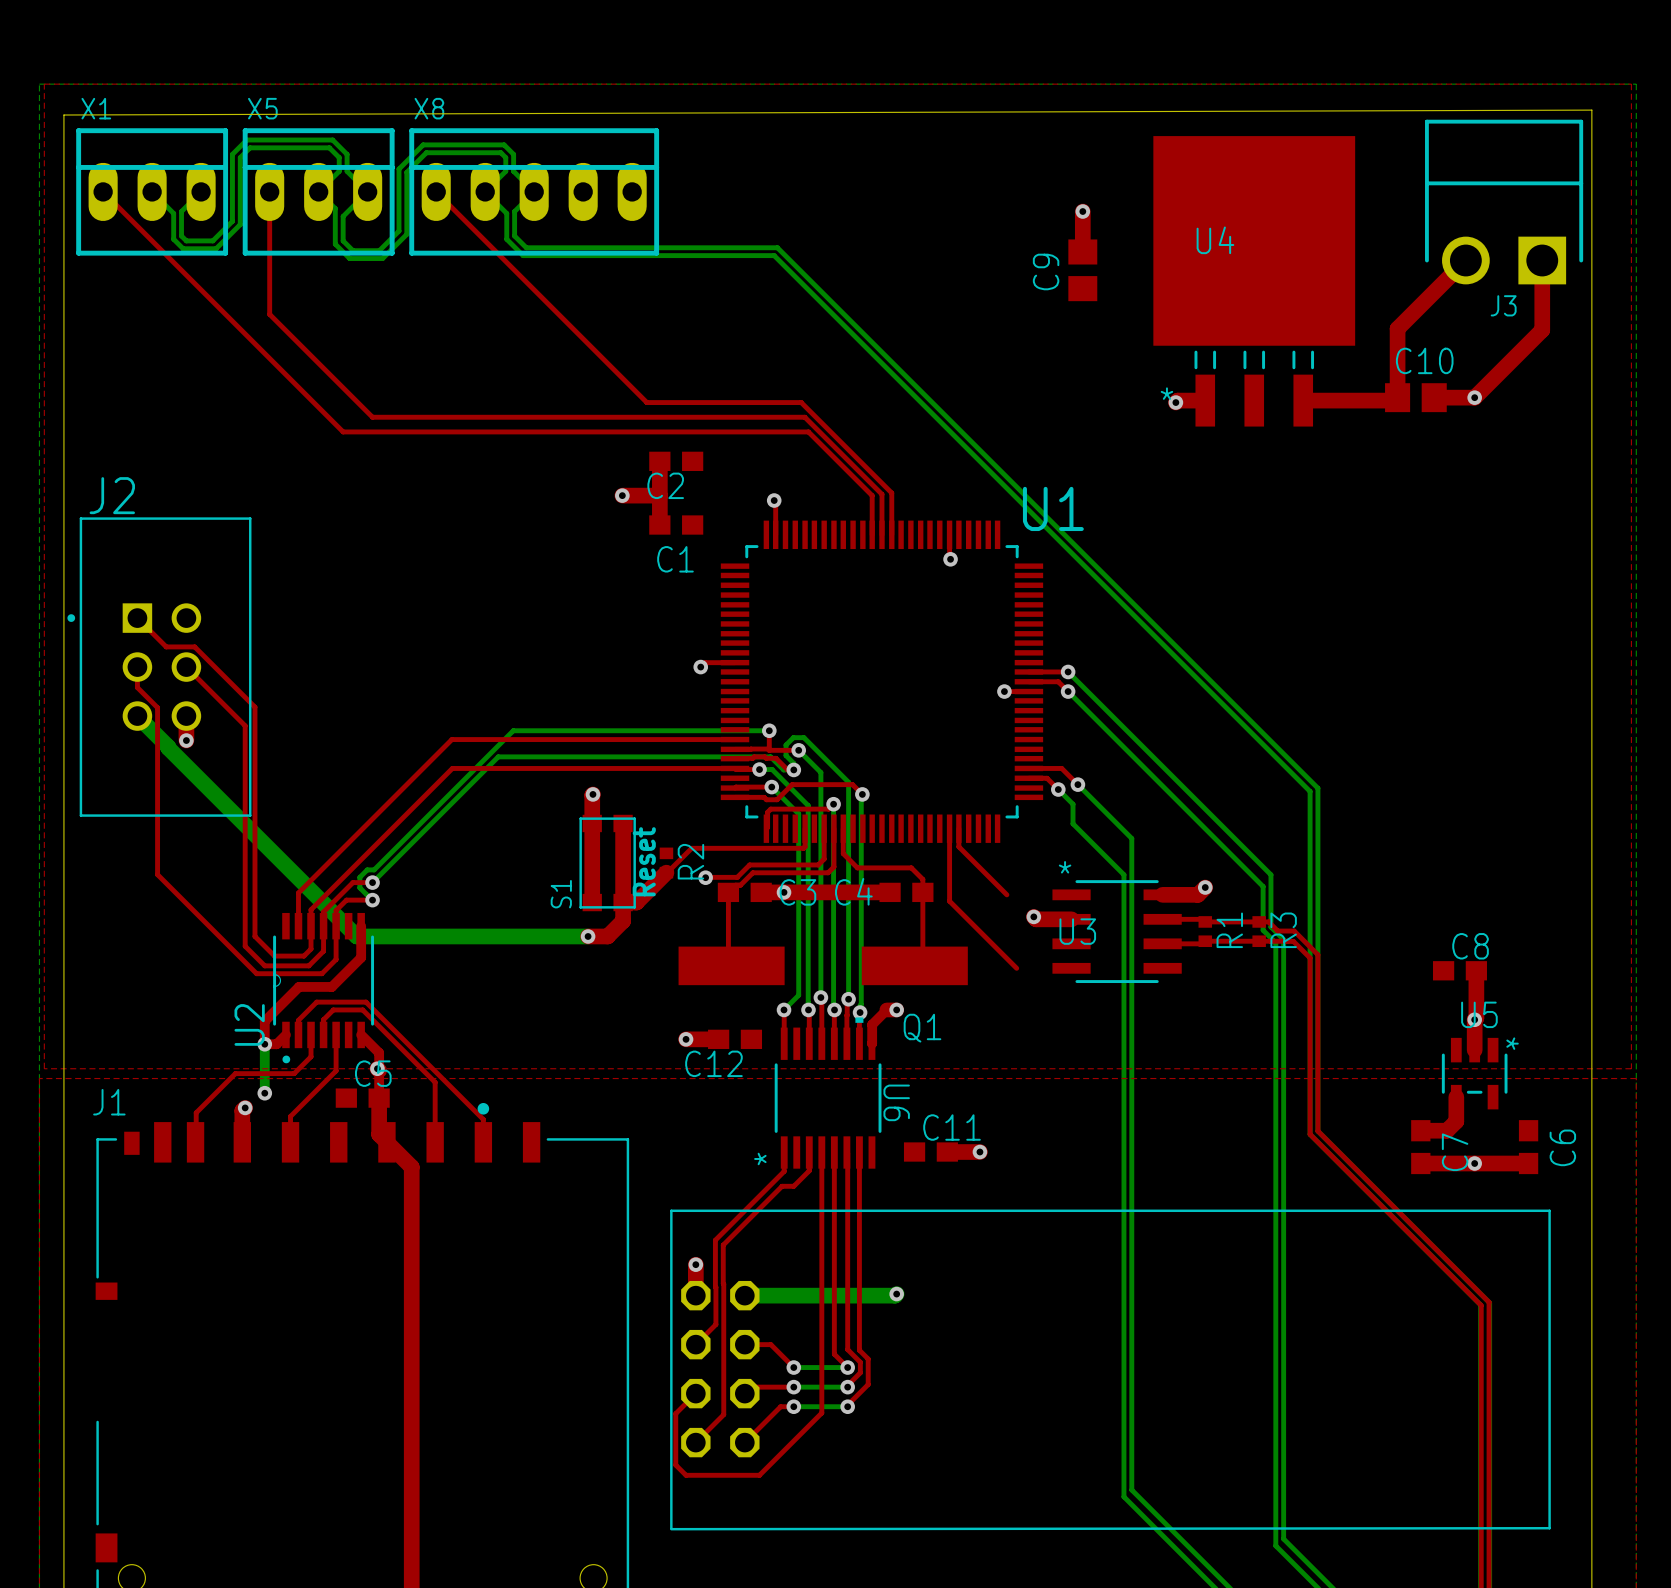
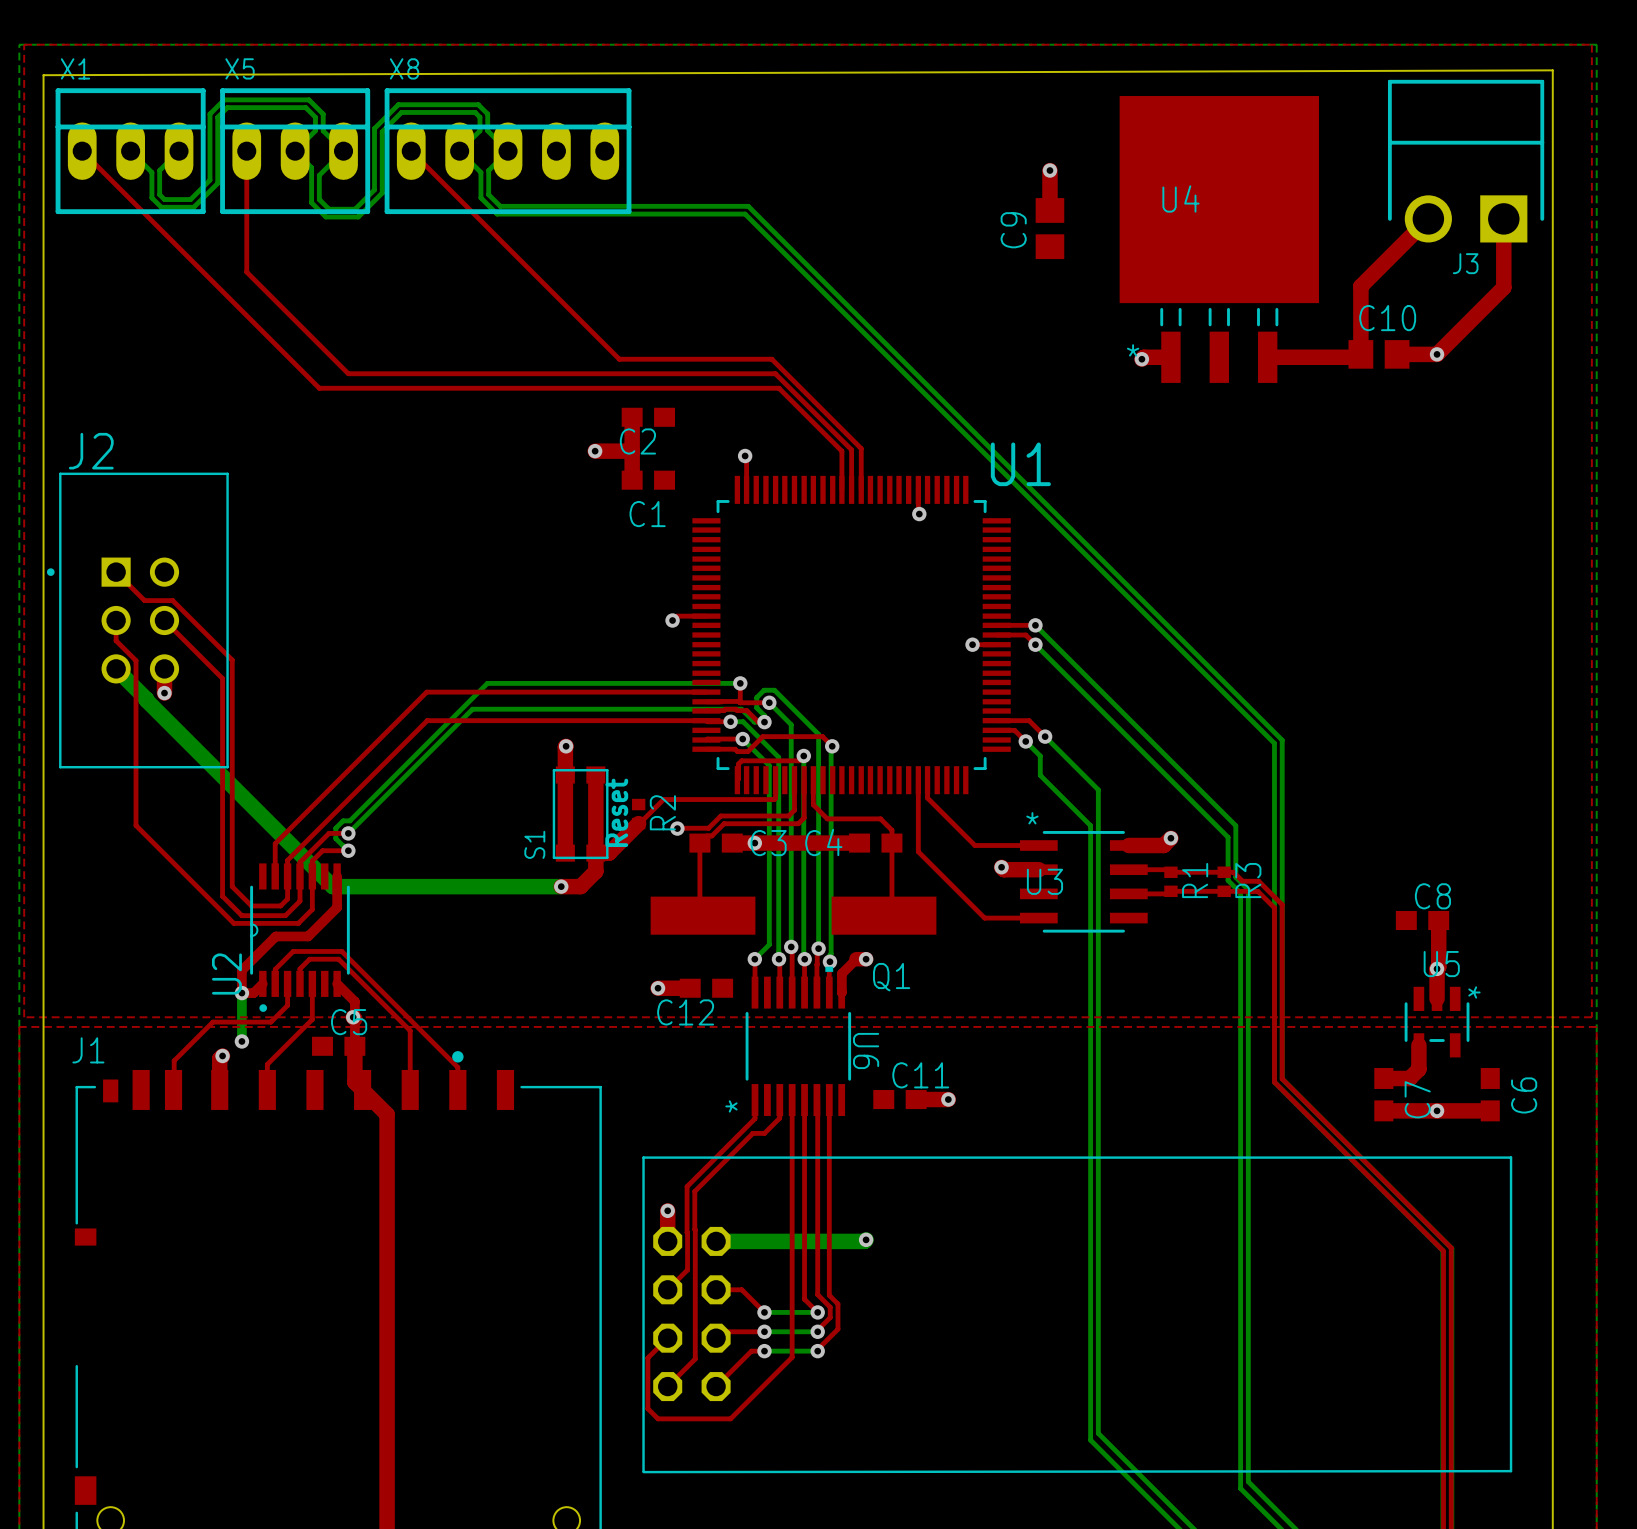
top track: none -> (974, 845) (1038, 845)
top track: none -> (984, 918) (1038, 918)

